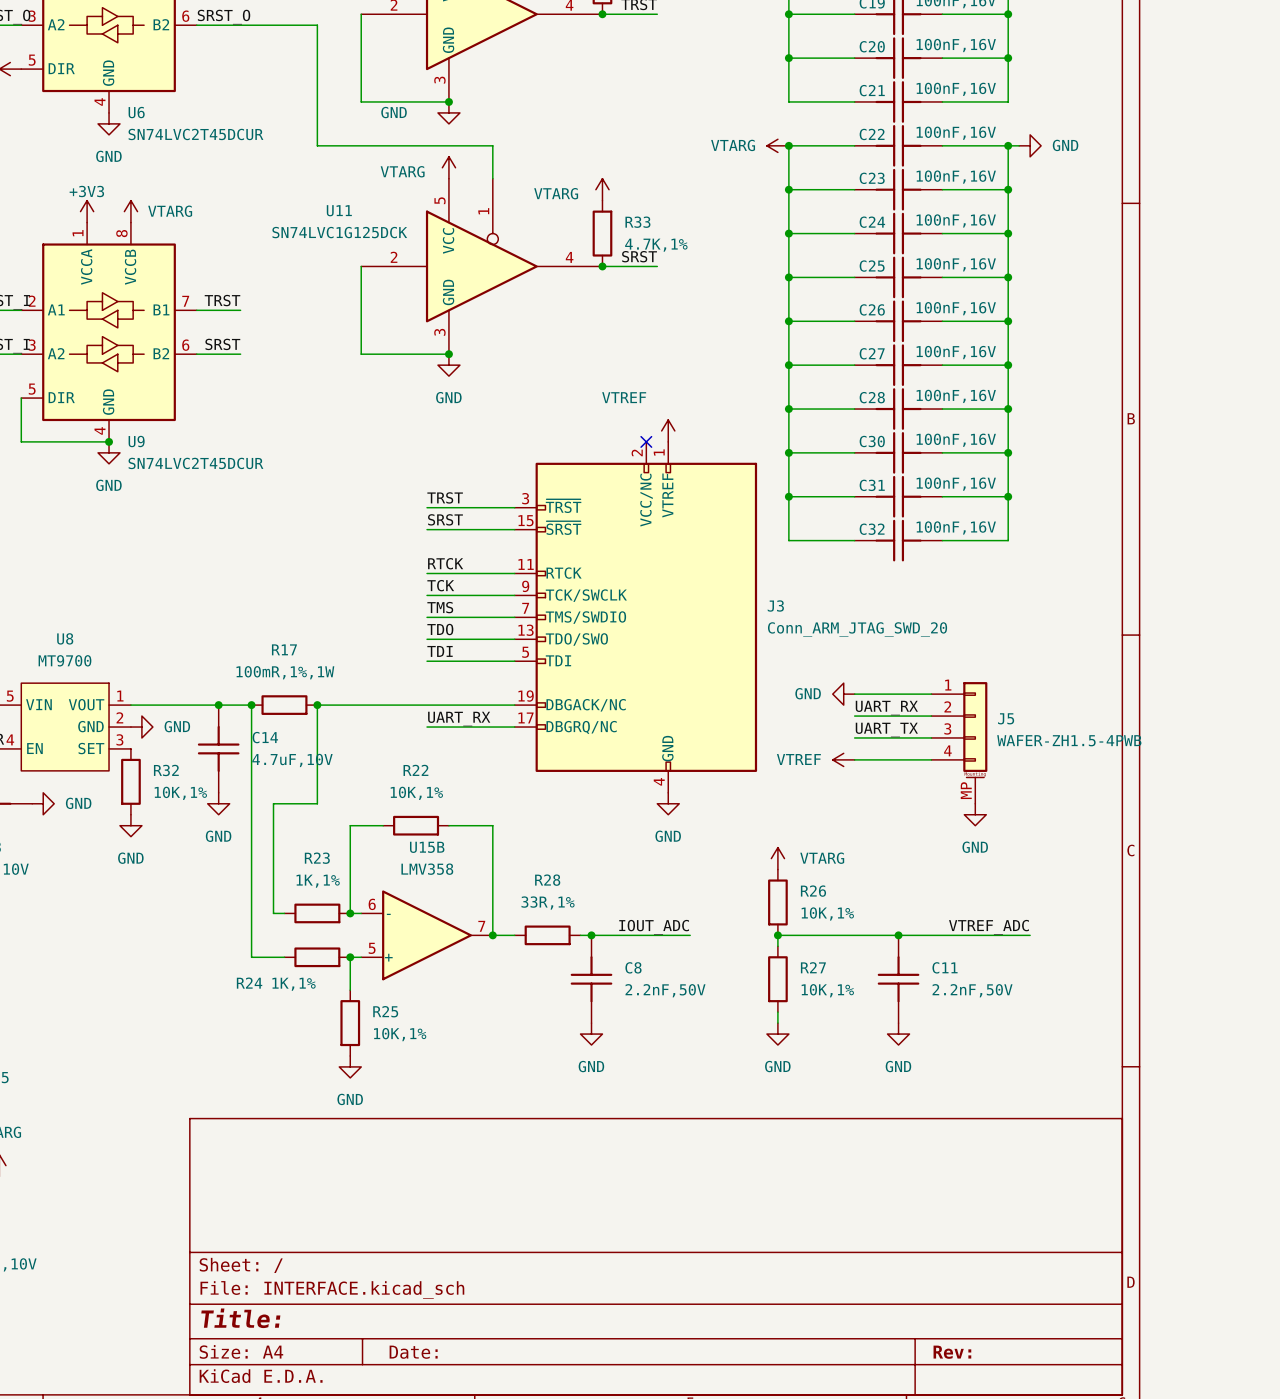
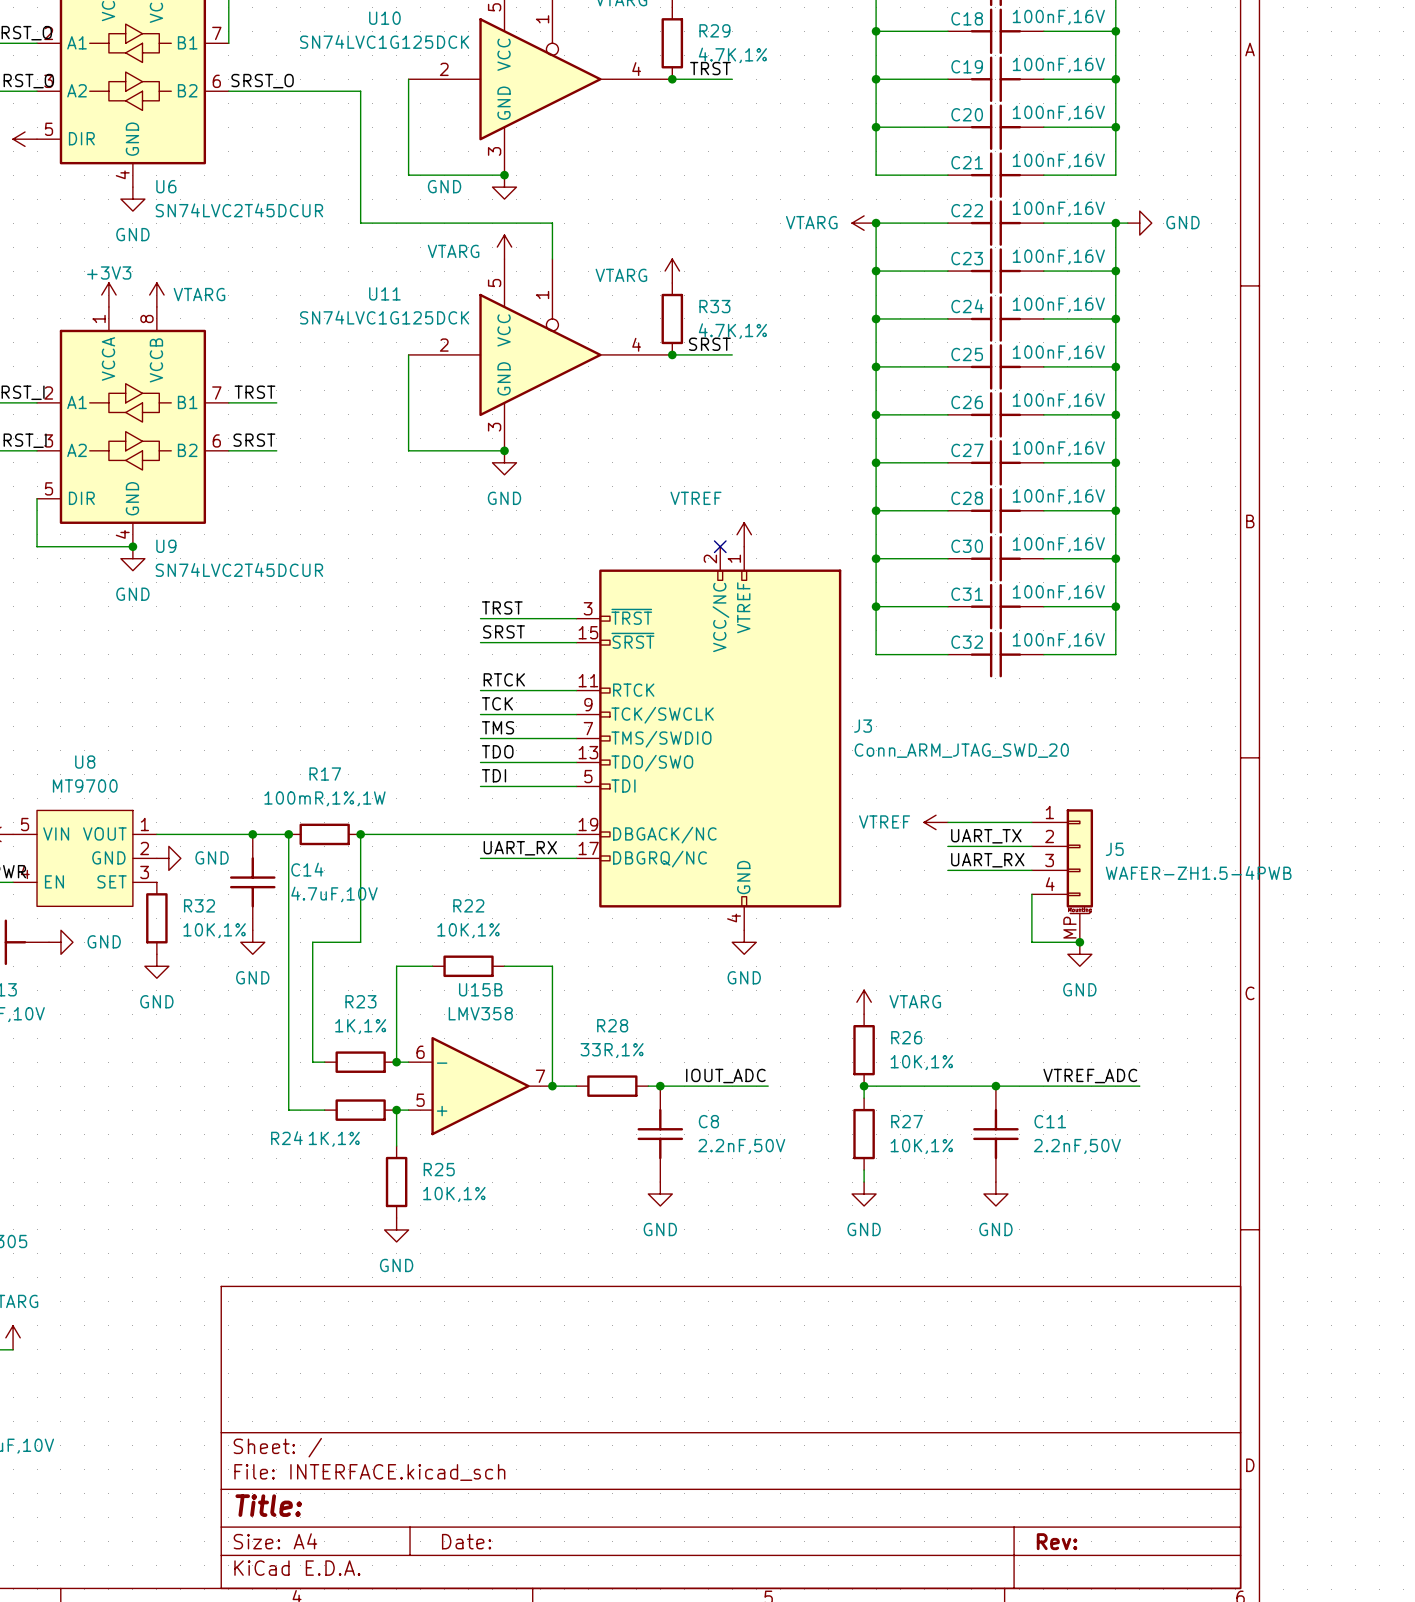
power symbol: GND (843, 694) -> VTREF (936, 822)
label: UART_RX (886, 708) -> UART_TX (986, 836)
label: UART_TX (886, 729) -> UART_RX (987, 860)
power symbol: VTREF (843, 759) -> none
wire: (854, 759) (931, 759) -> (1079, 942) (1031, 942) (1031, 894)
junction: none -> (1079, 942)

